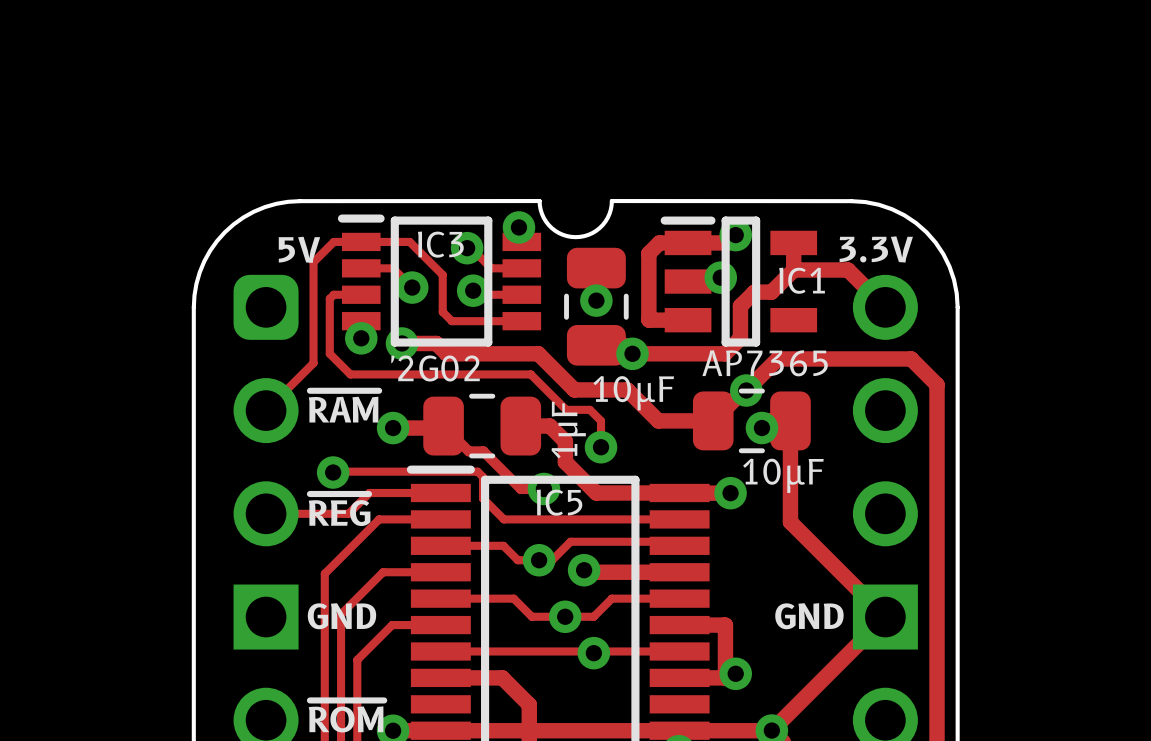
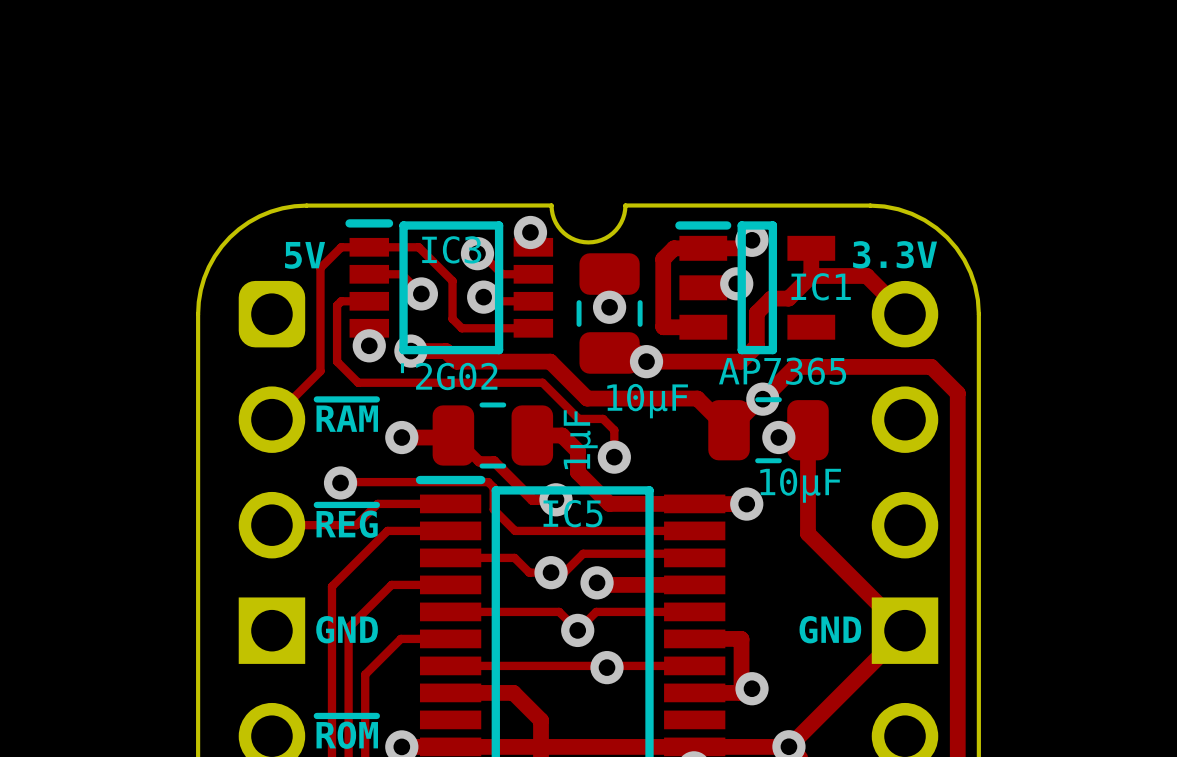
track: (627, 389) (658, 420) (713, 420) -> (641, 398) (697, 398) (729, 430)
track: (513, 598) (531, 616) (593, 616) (611, 598) -> (525, 611) (559, 611) (577, 630) (596, 611) (625, 611)

